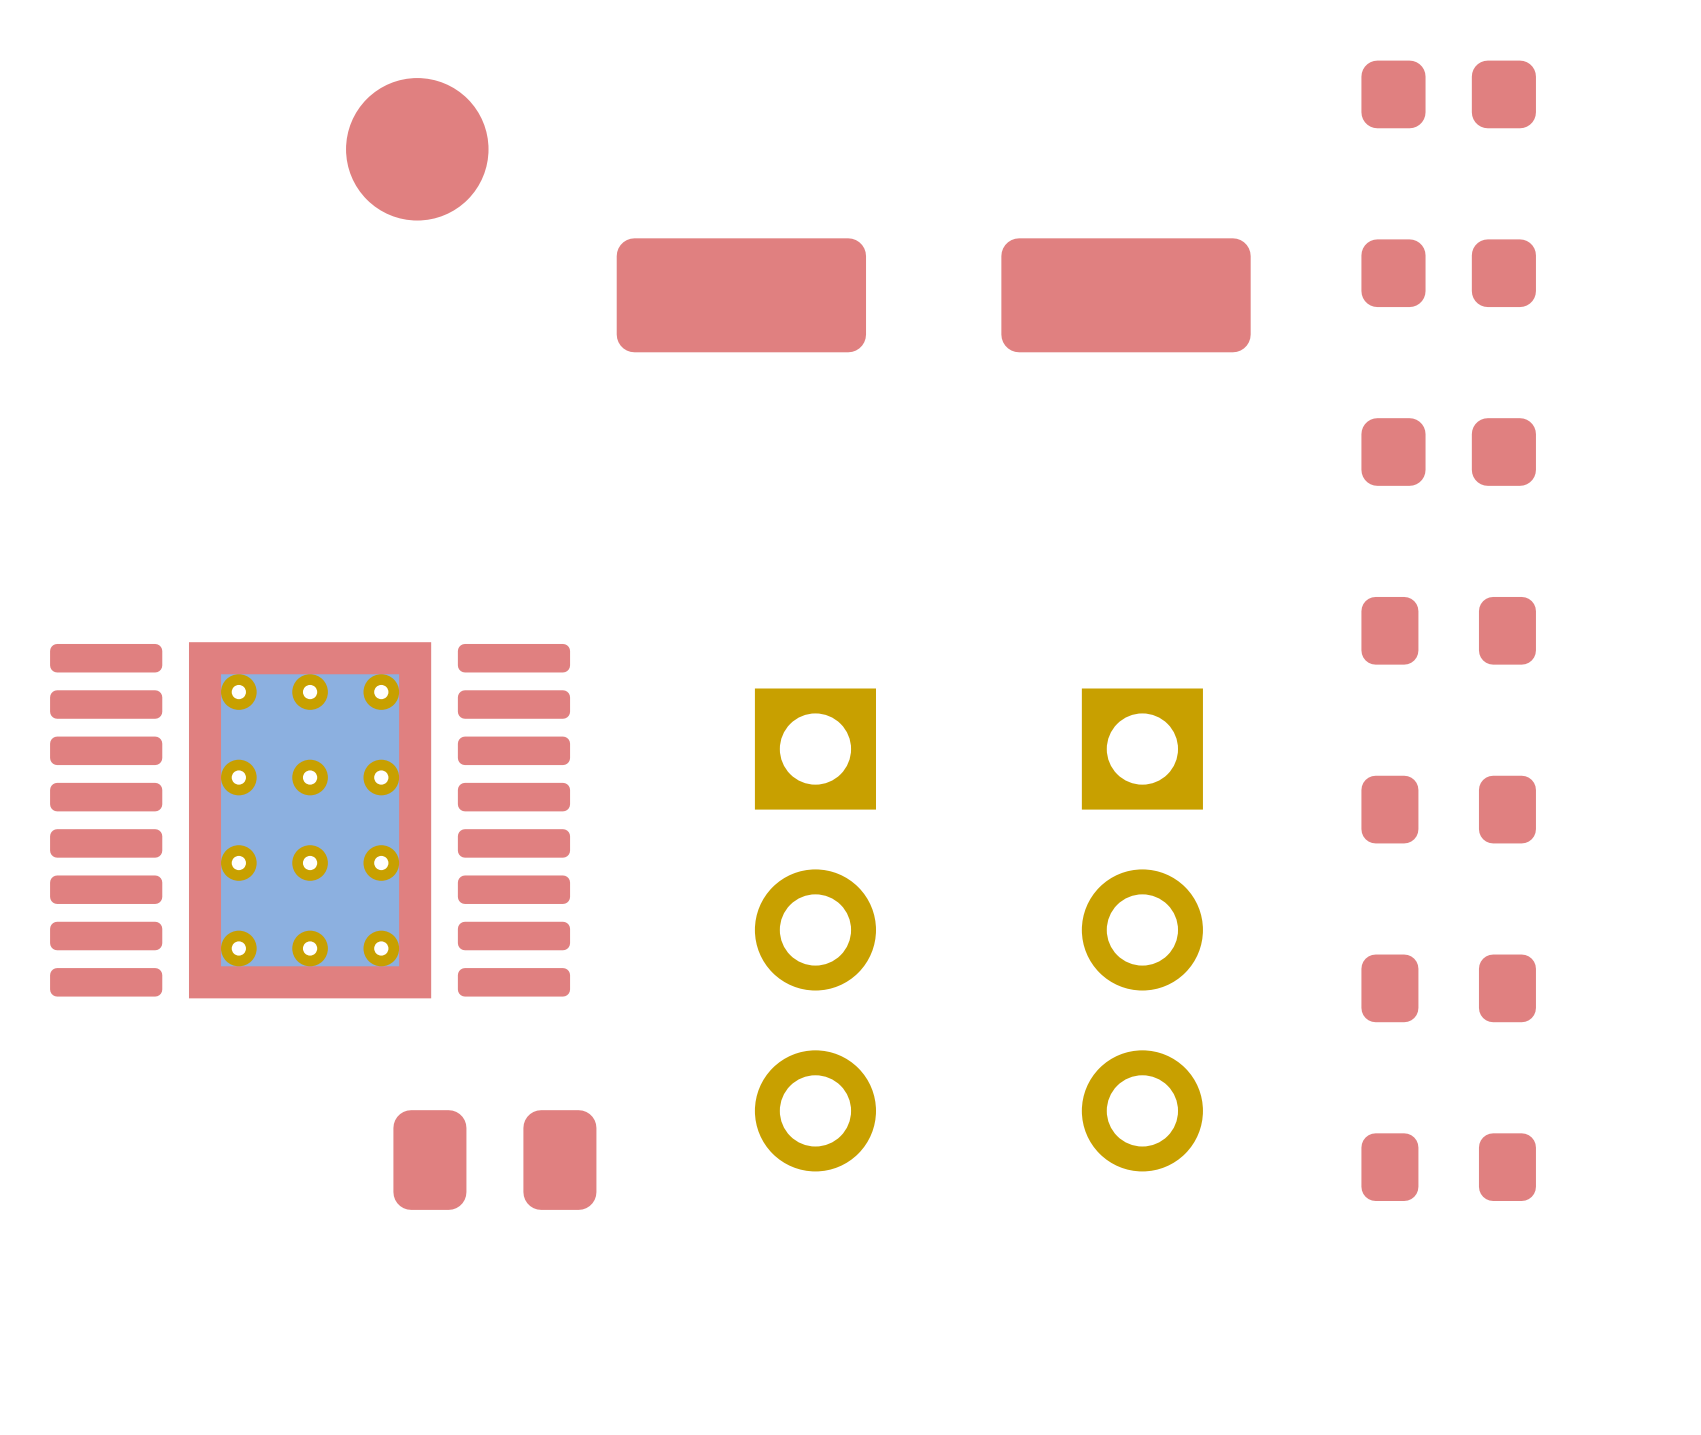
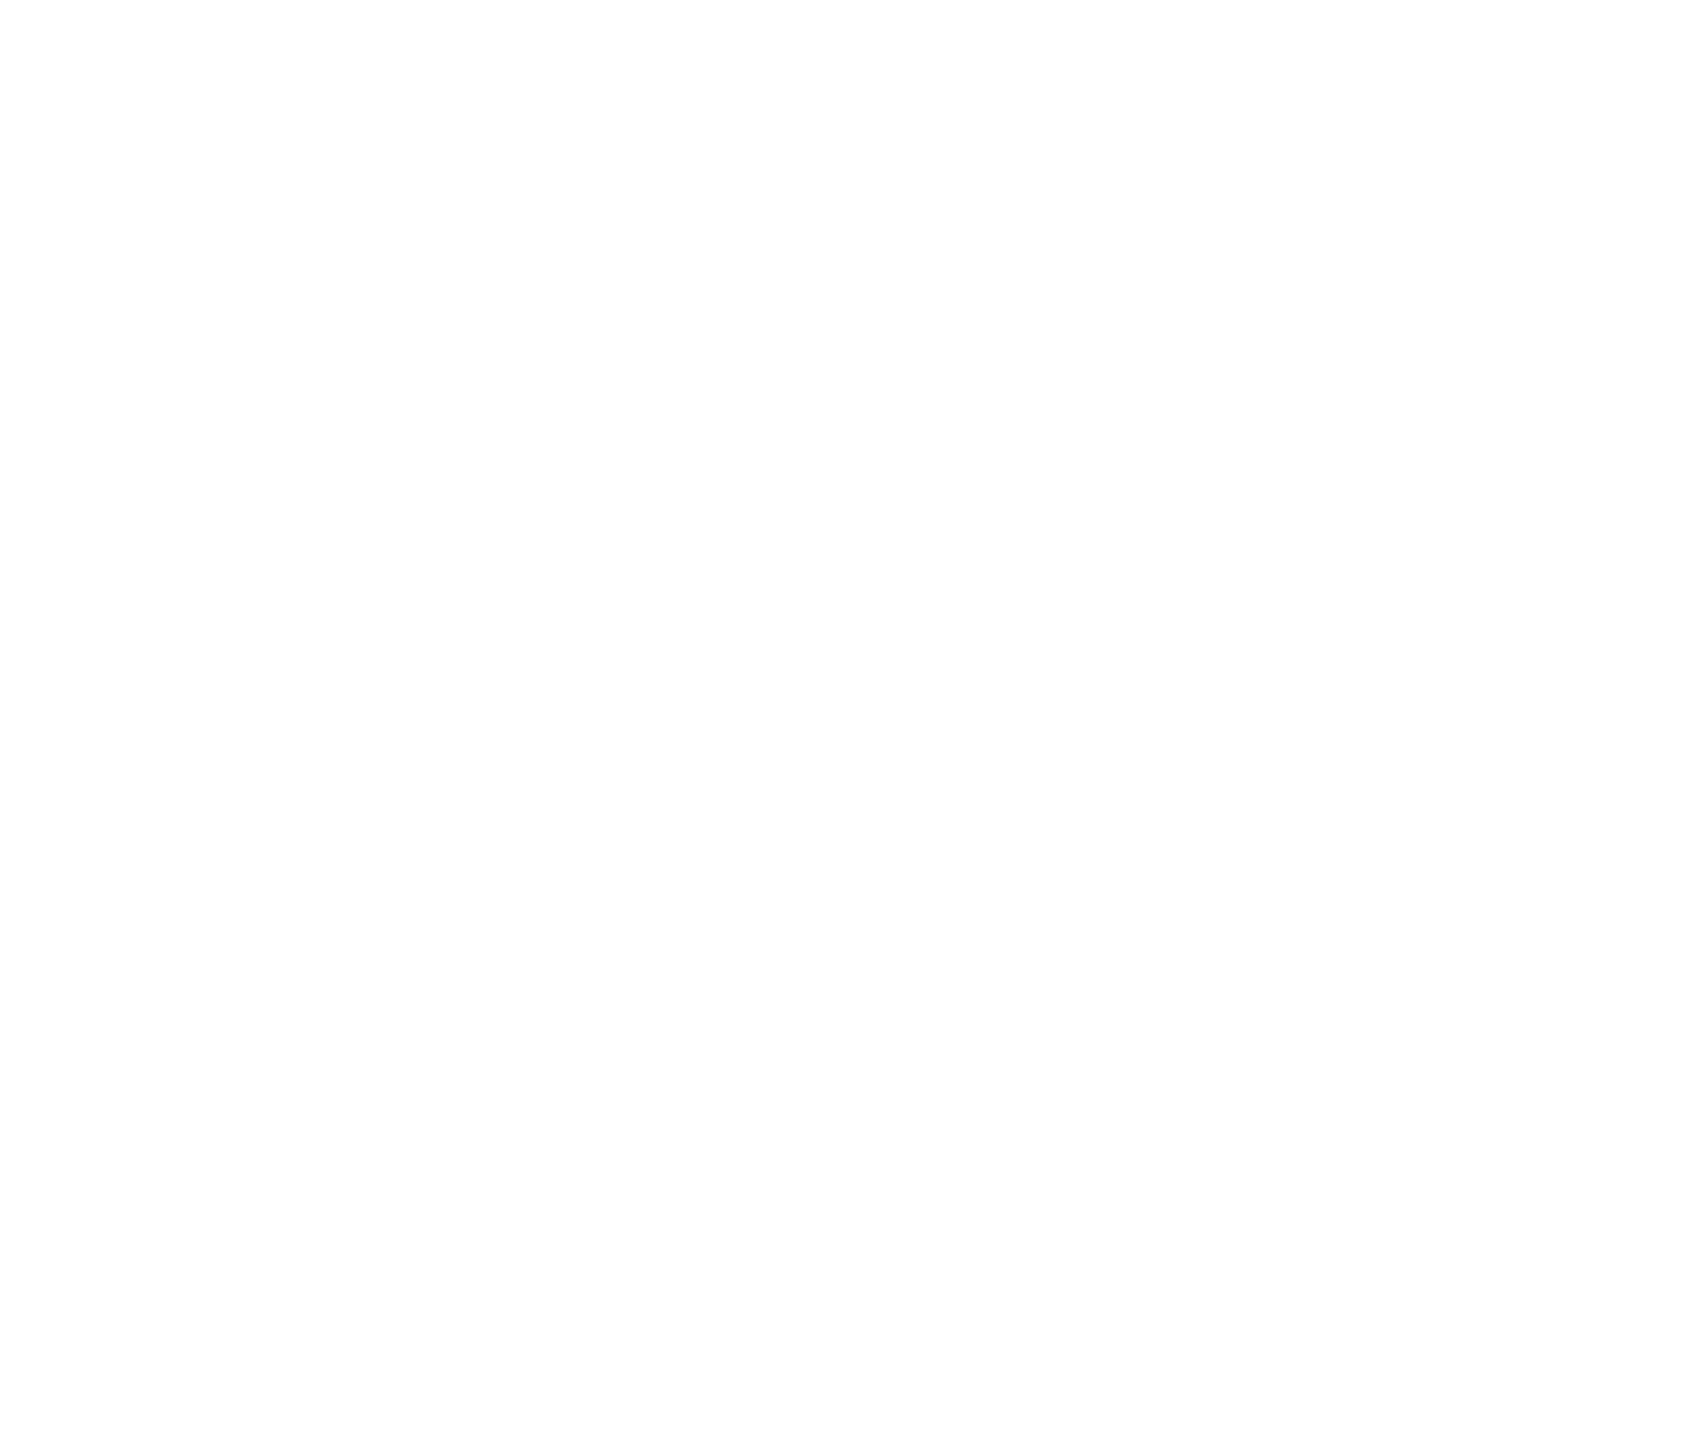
part: (1448, 94) -> none
part: (417, 149) -> none
part: (1448, 273) -> none
part: (933, 295) -> none
part: (1448, 452) -> none
part: (1448, 630) -> none
part: (1448, 809) -> none
part: (310, 820) -> none
part: (815, 929) -> none
part: (1142, 929) -> none
part: (1448, 988) -> none
part: (494, 1160) -> none
part: (1448, 1167) -> none

